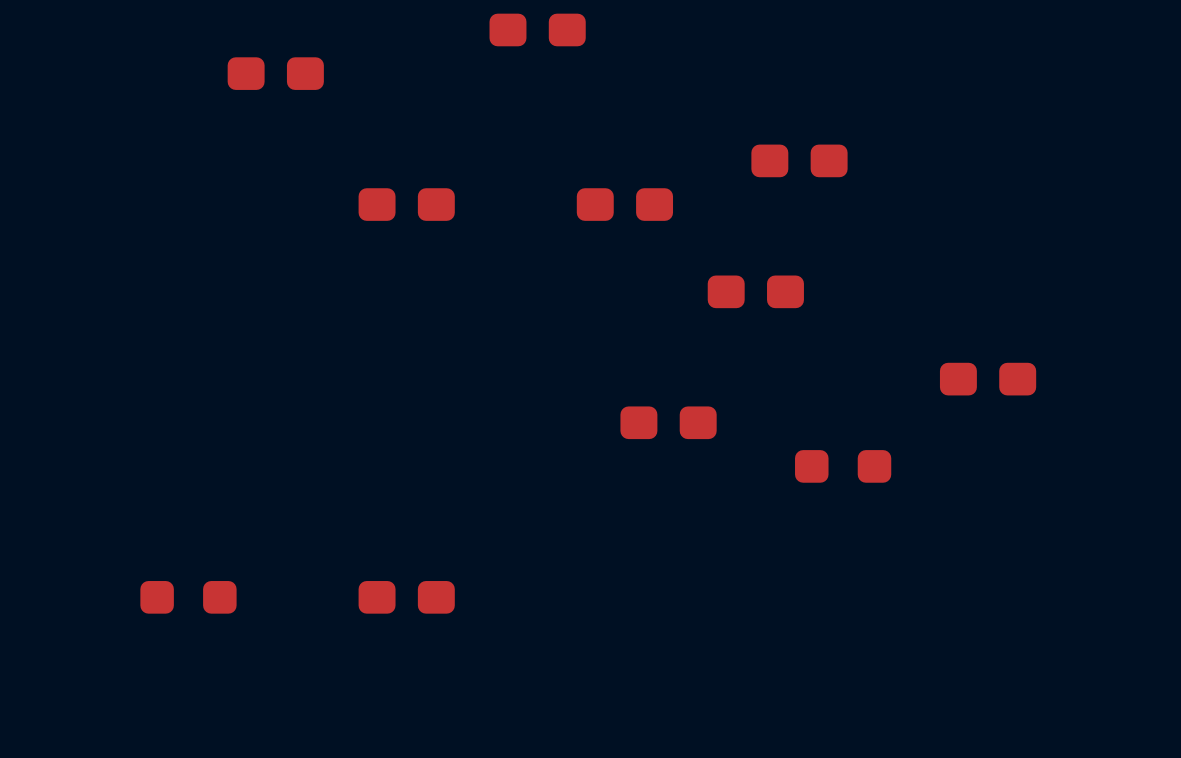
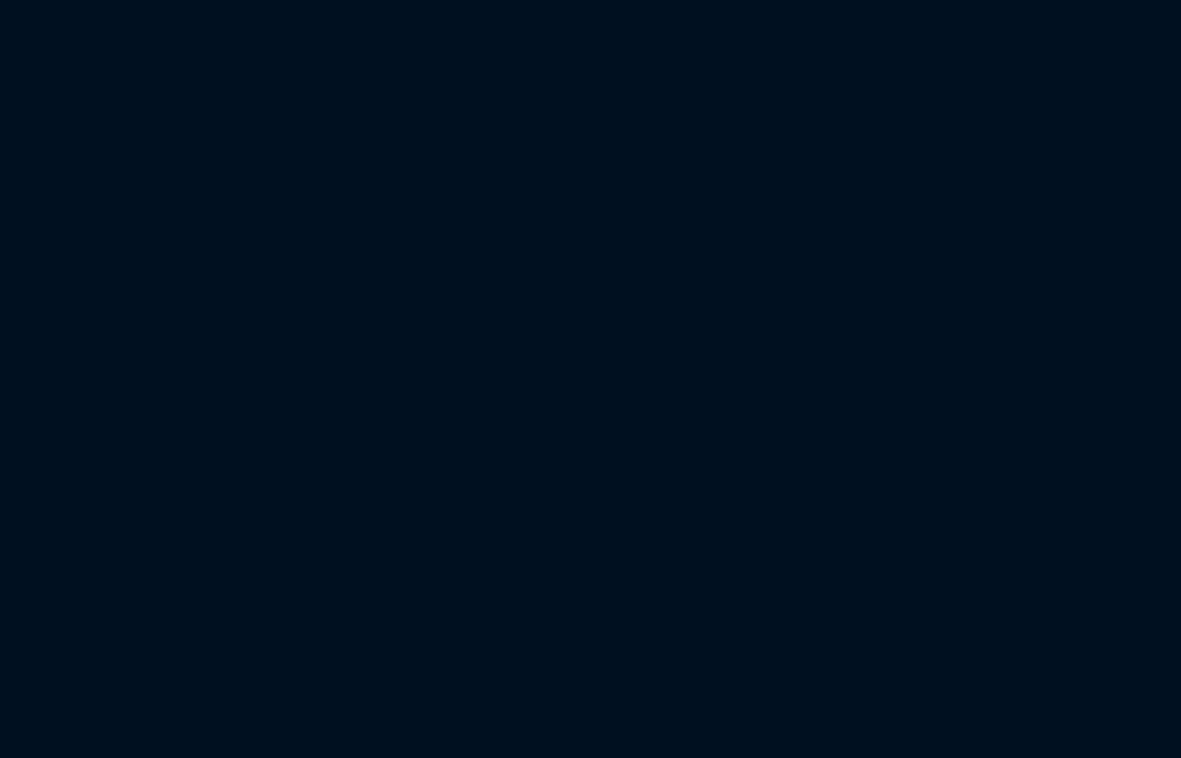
part: (537, 29) -> none
part: (275, 73) -> none
part: (799, 160) -> none
part: (406, 204) -> none
part: (624, 204) -> none
part: (755, 291) -> none
part: (988, 379) -> none
part: (668, 422) -> none
part: (843, 466) -> none
part: (188, 597) -> none
part: (406, 597) -> none

